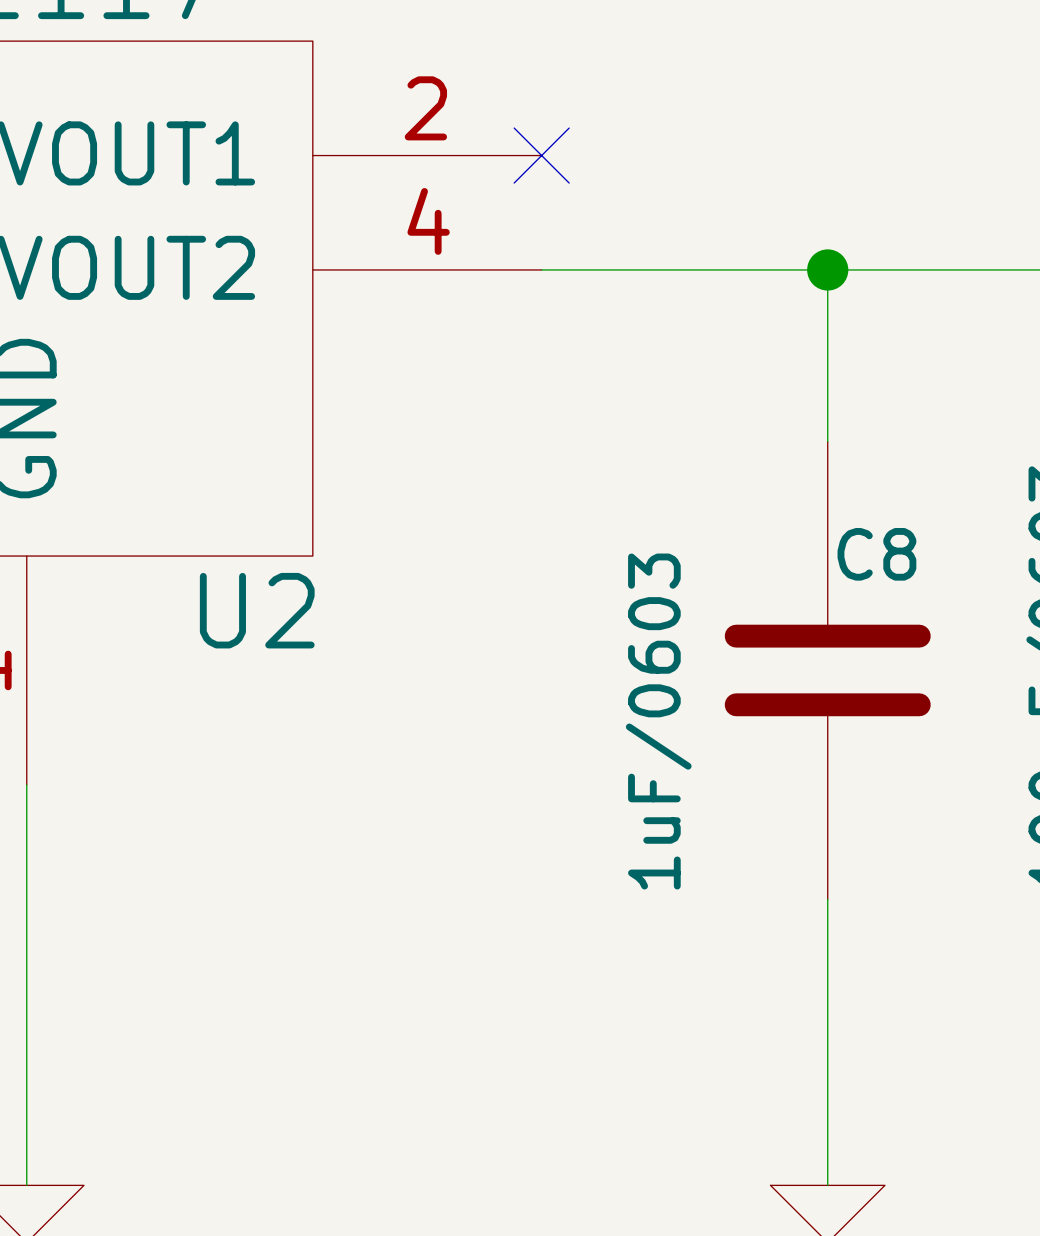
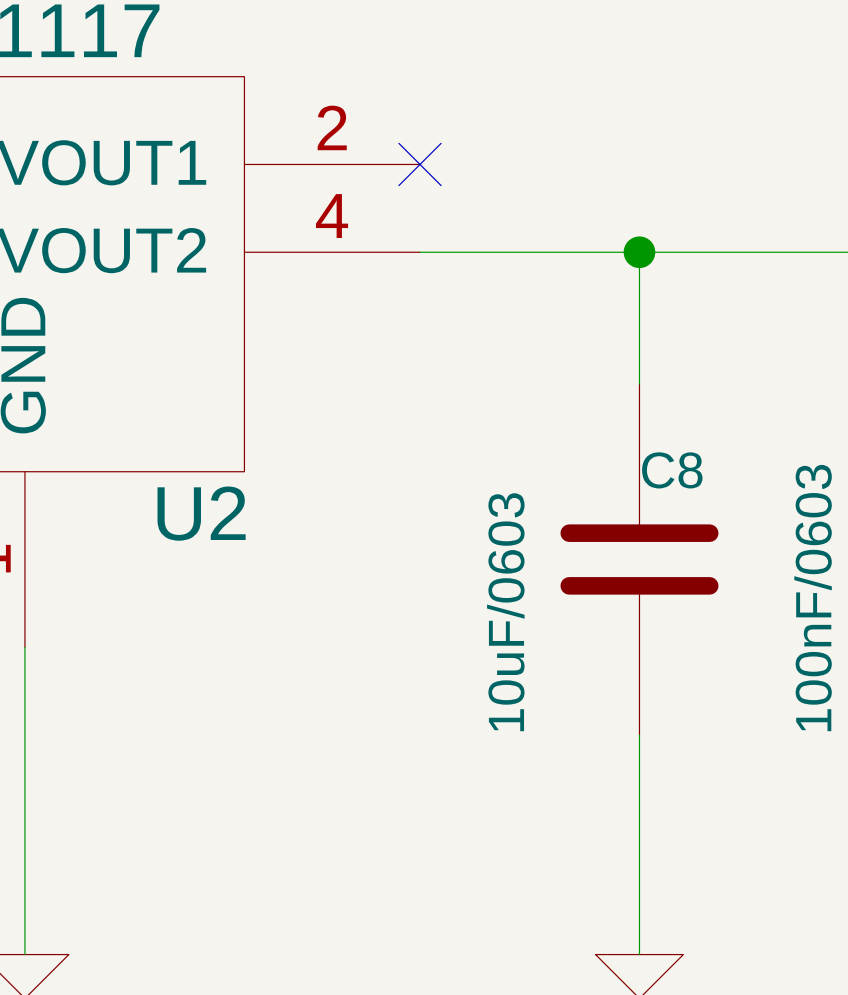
C8 value: 1uF/0603 (658, 721) -> 10uF/0603 (505, 612)

